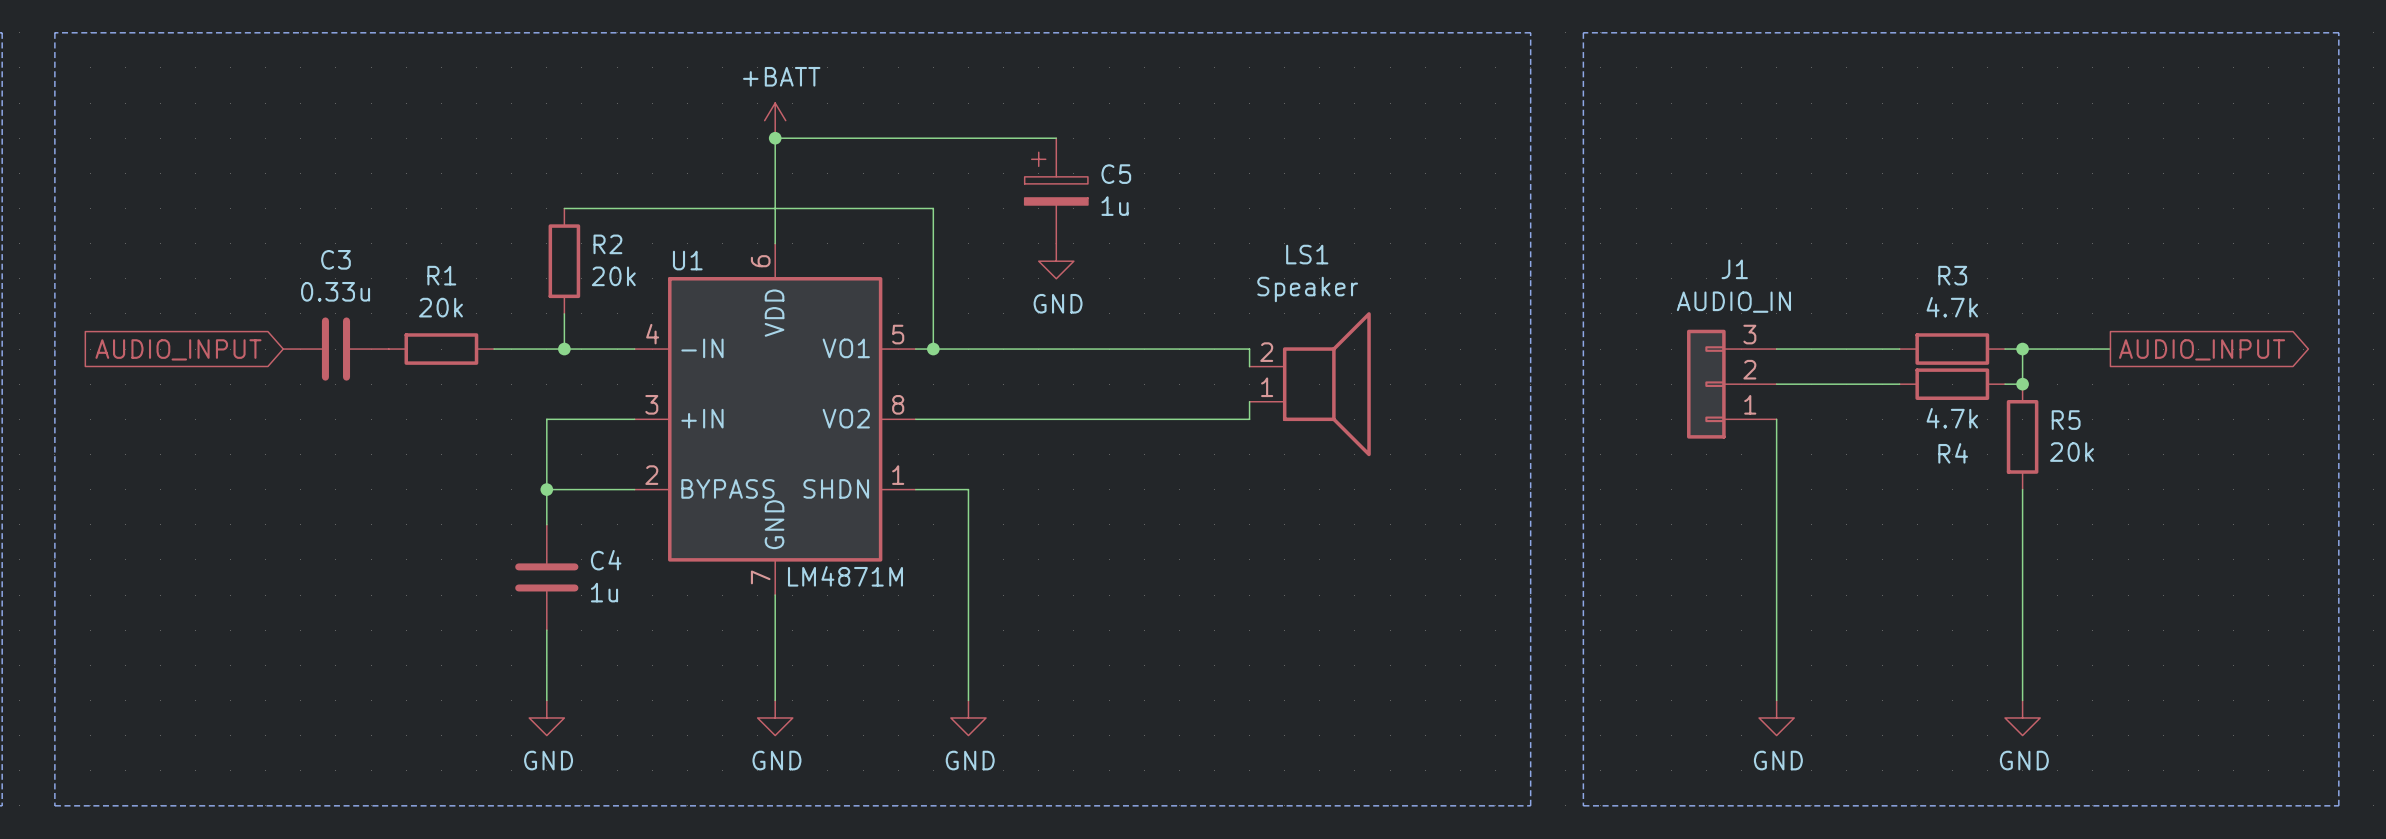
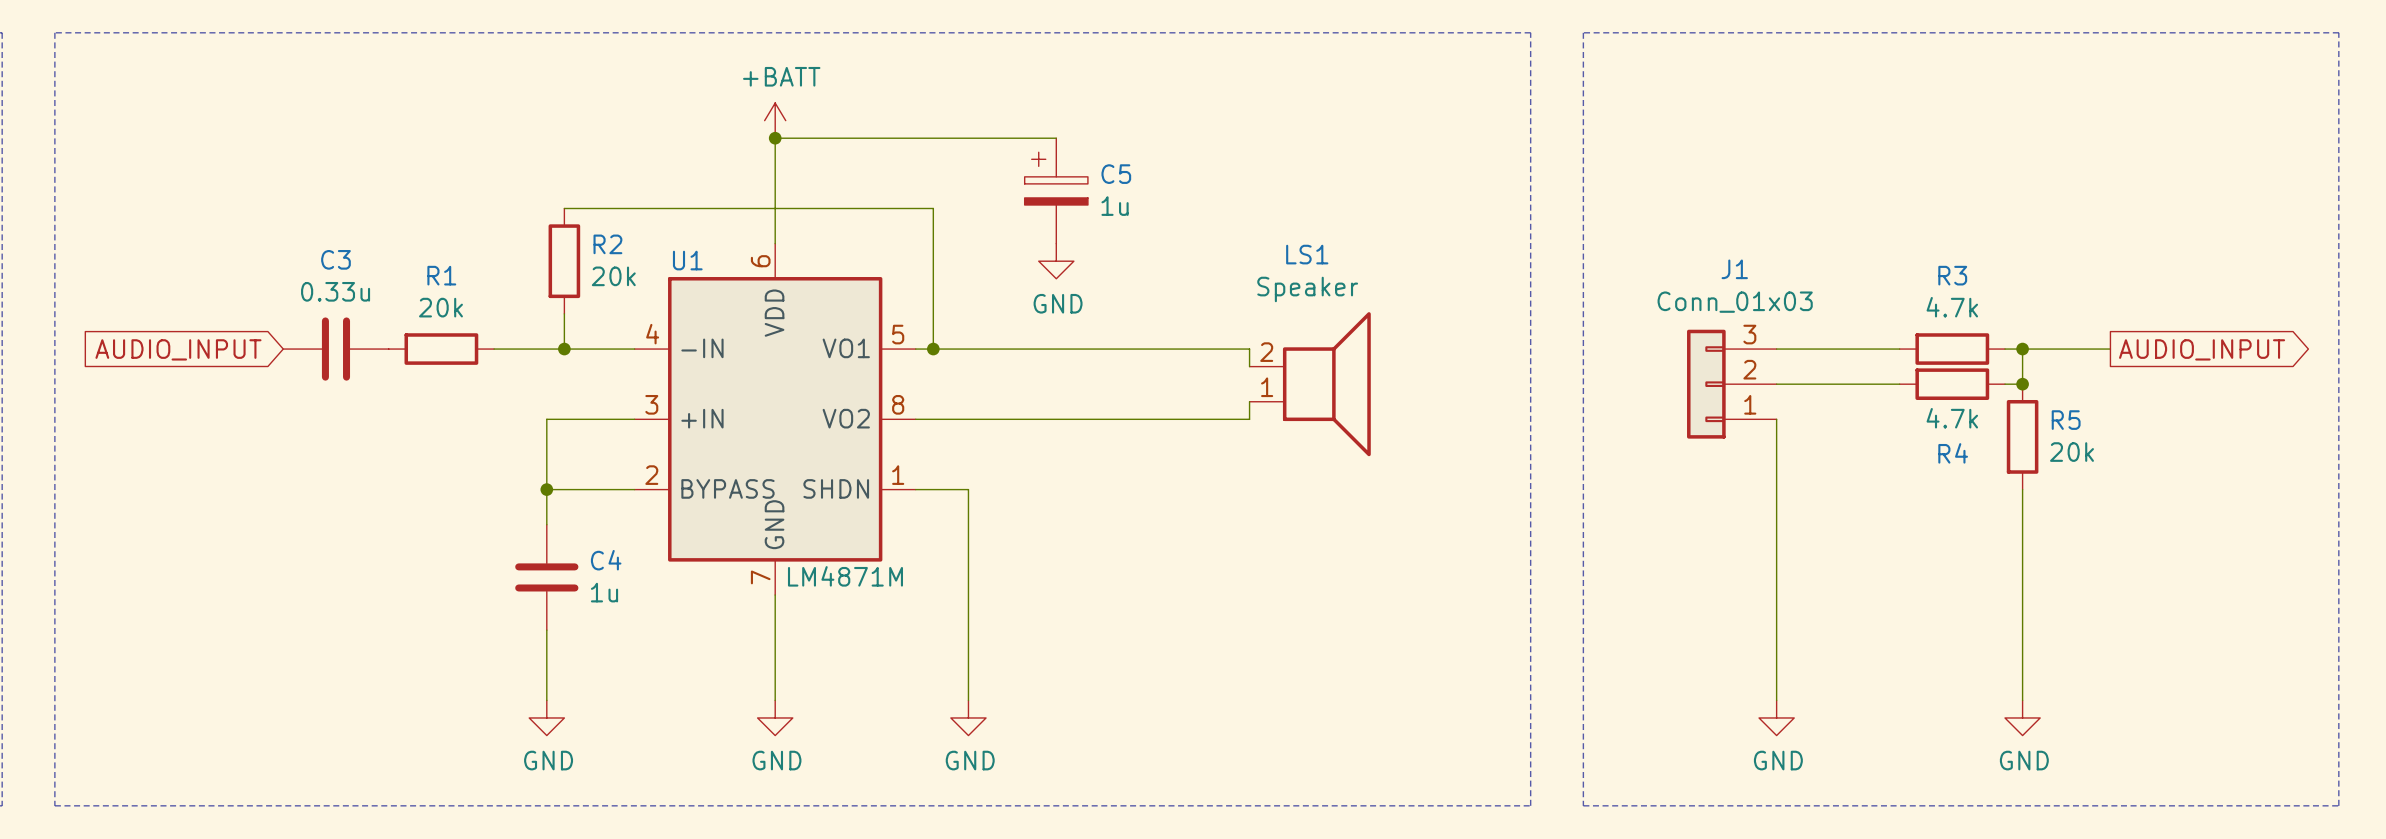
J1 value: AUDIO_IN (1733, 302) -> Conn_01x03 (1735, 302)

